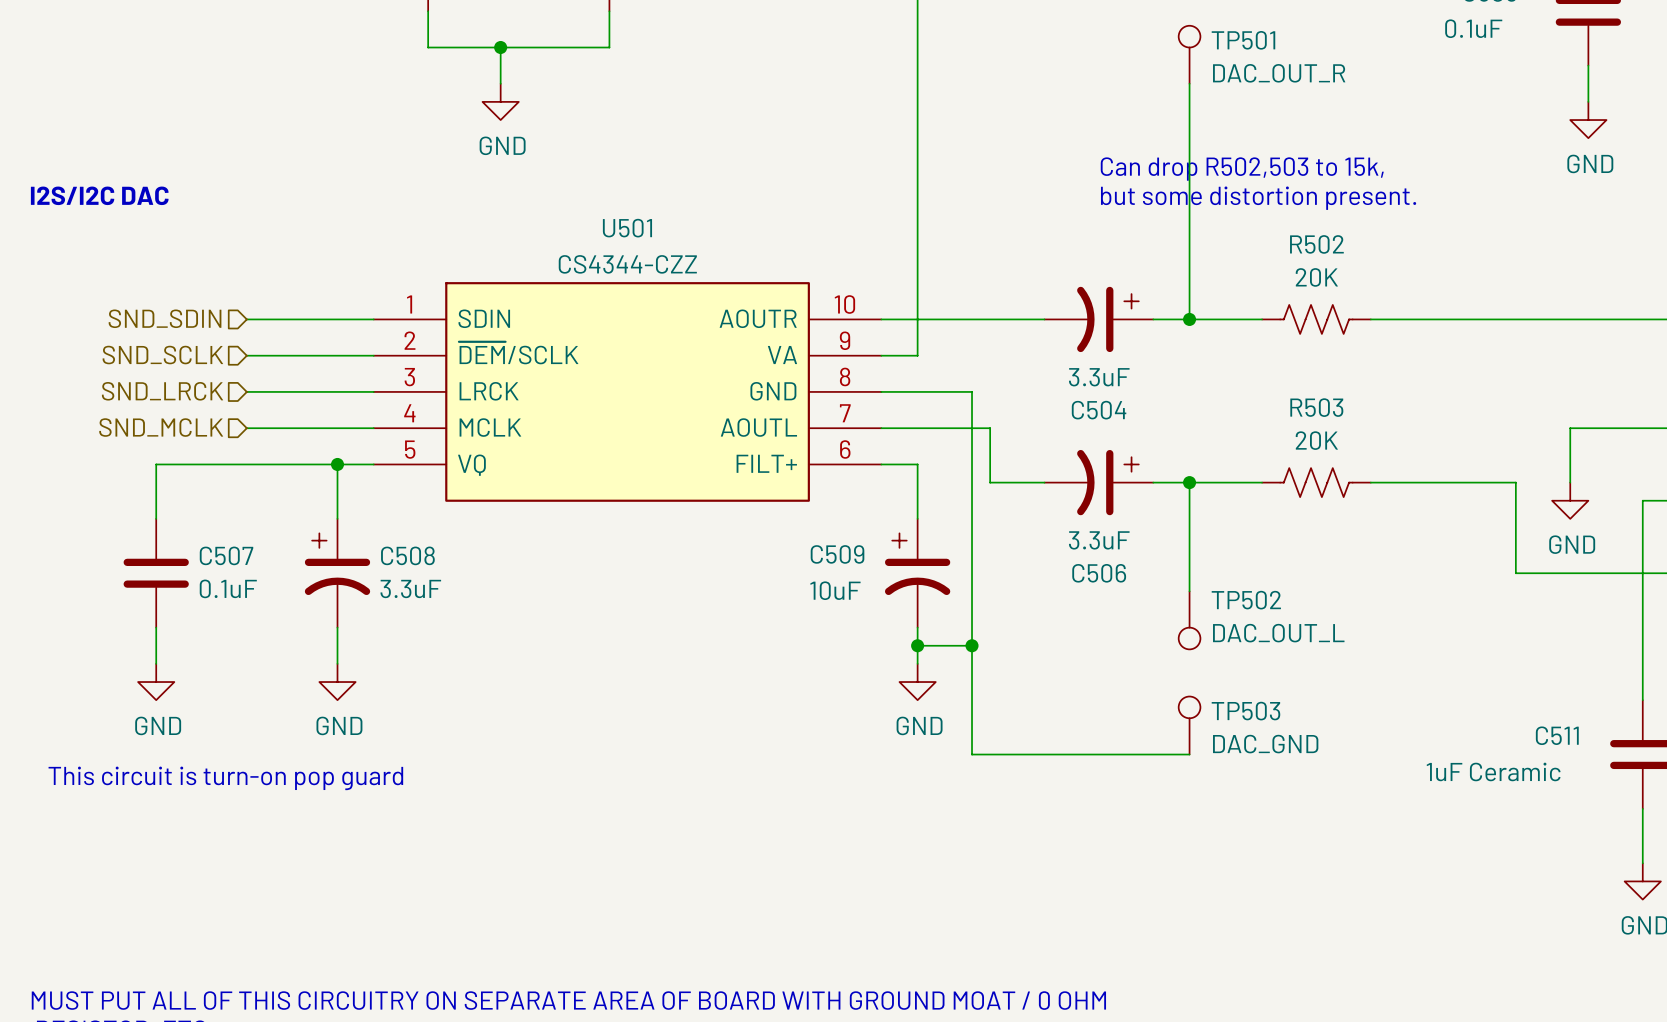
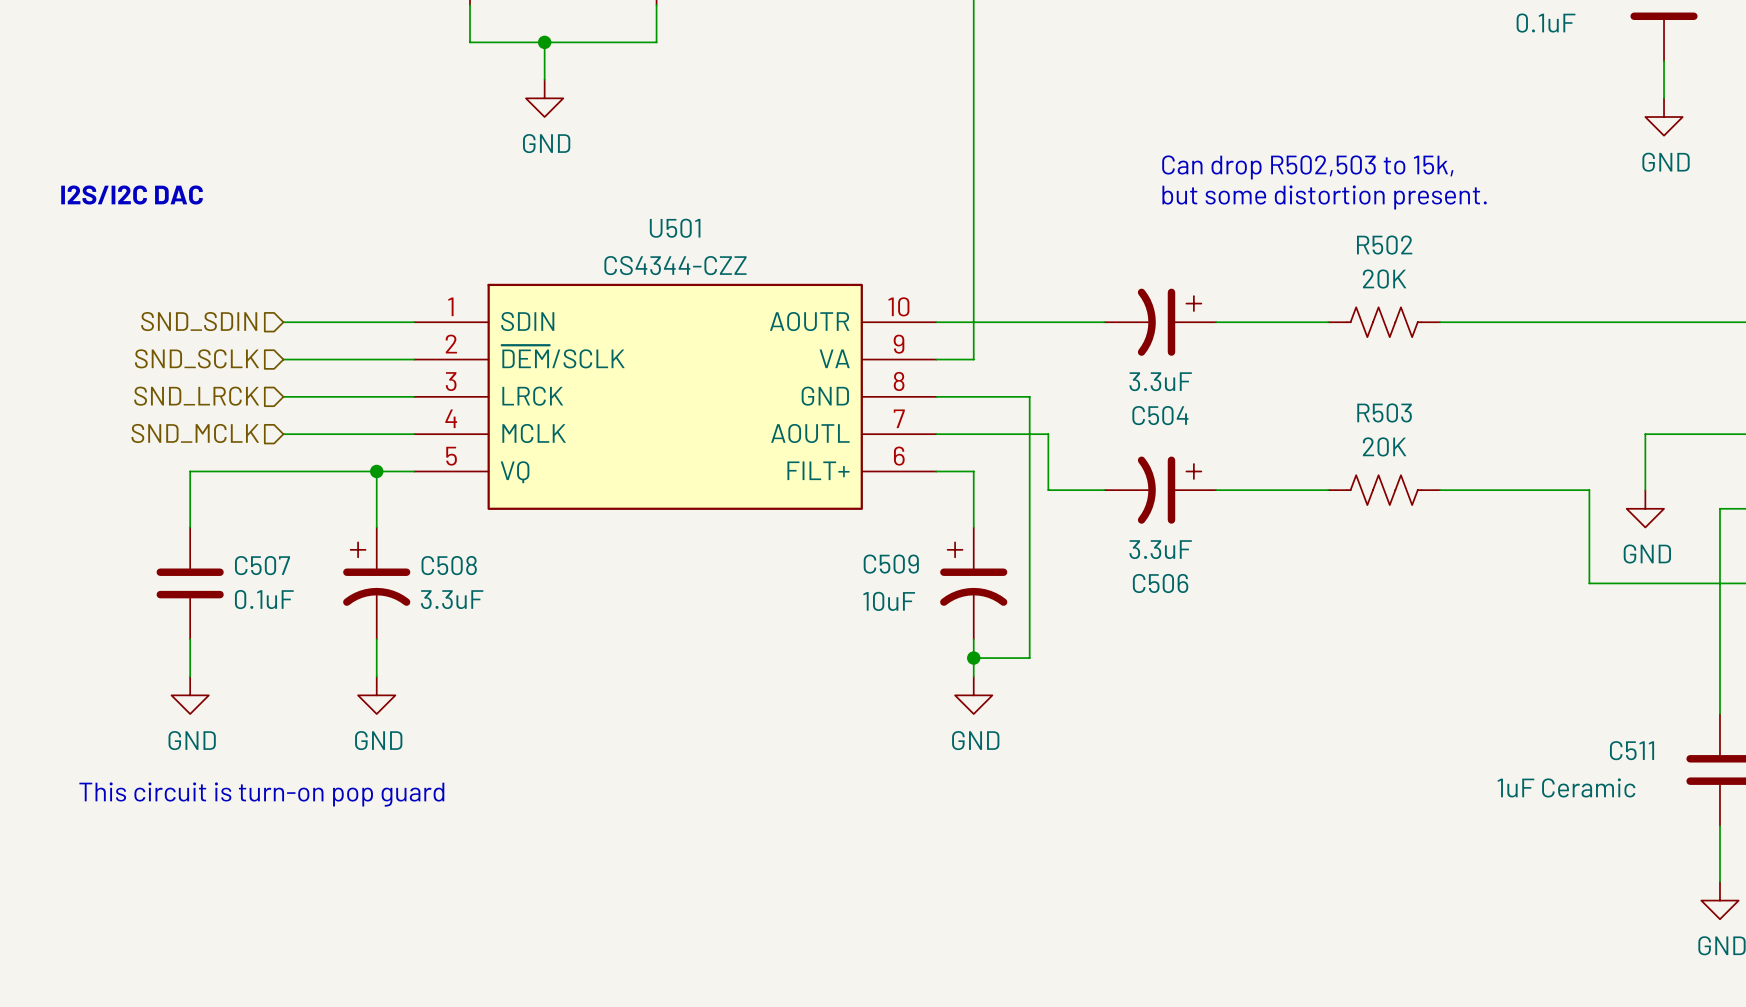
TP501: DAC_OUT_R (1189, 54) -> none
wire: (1189, 83) (1189, 319) -> none
junction: (1189, 319) -> none
wire: (1189, 482) (1189, 591) -> none
junction: (1189, 482) -> none
TP502: DAC_OUT_L (1189, 620) -> none
wire: (972, 645) (972, 754) (1189, 754) -> none
junction: (972, 645) -> none
TP503: DAC_GND (1189, 725) -> none

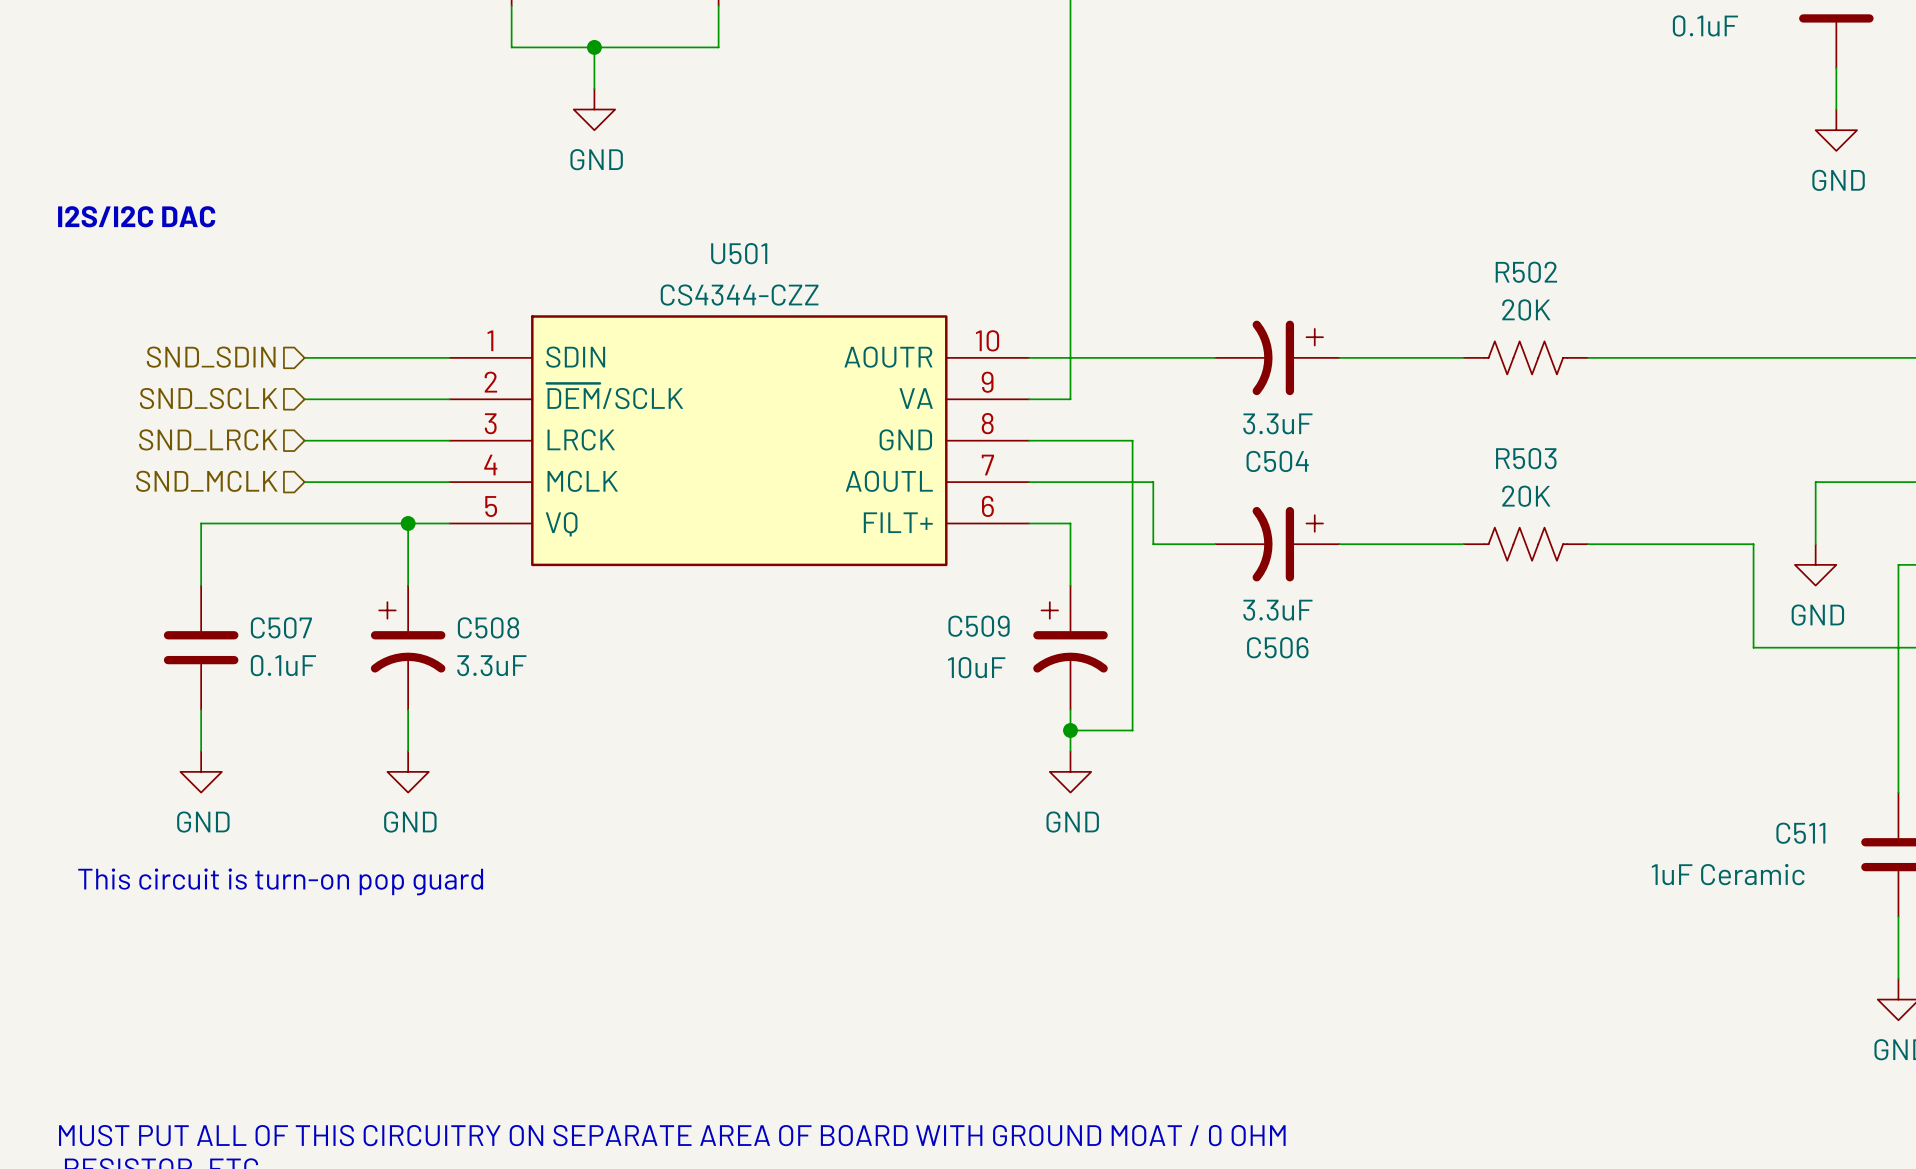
text: Can drop R502,503 to 15k, (1307, 167) -> none
text: but some distortion present. (1324, 197) -> none

